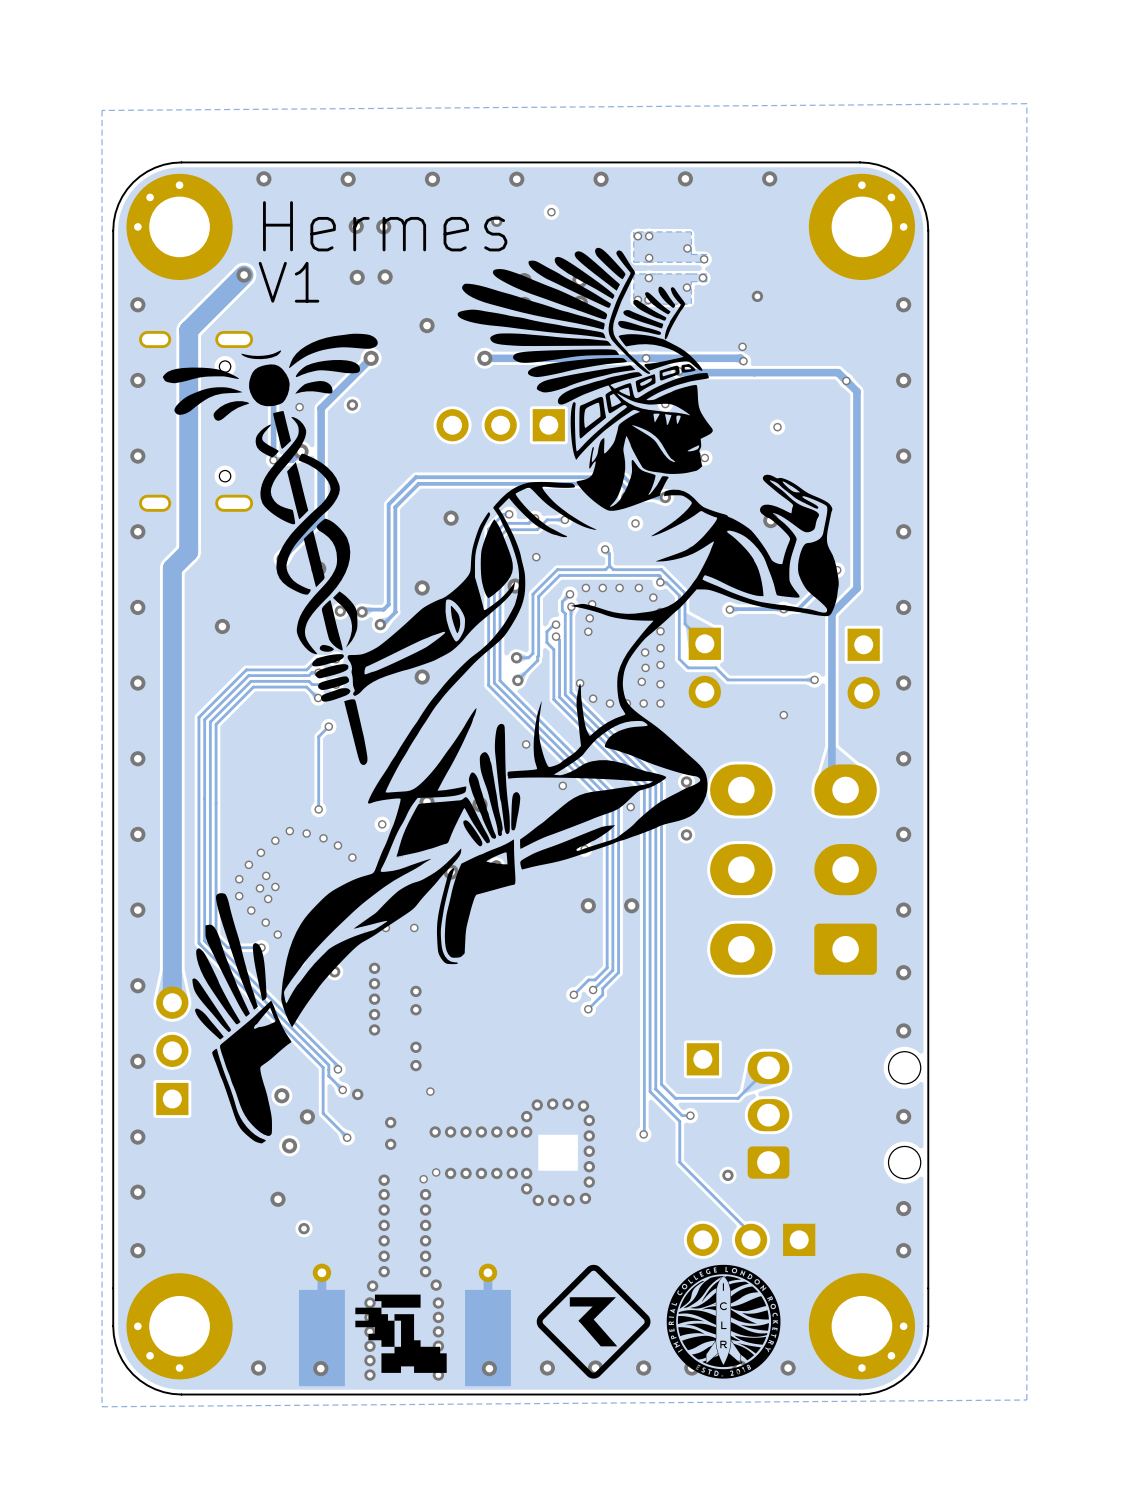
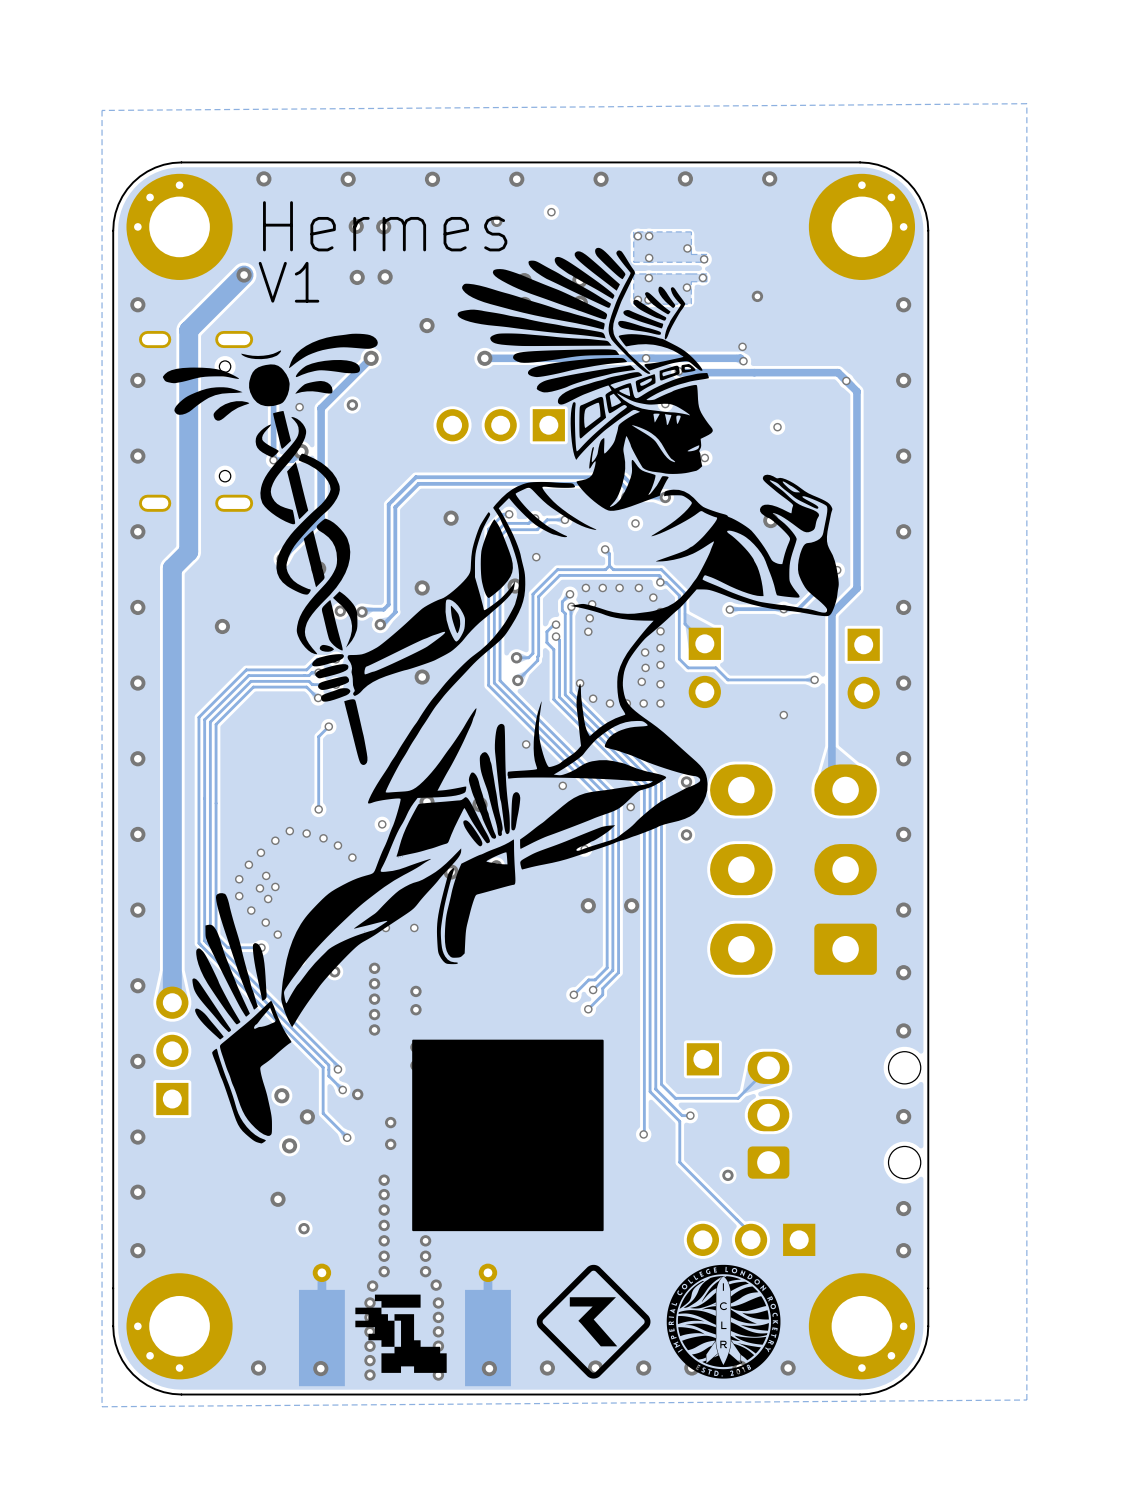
drawing: none -> [412, 1039, 604, 1232]

